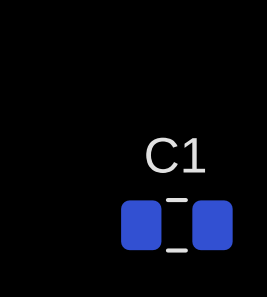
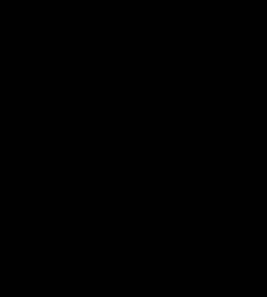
C1: (176, 225) -> none

